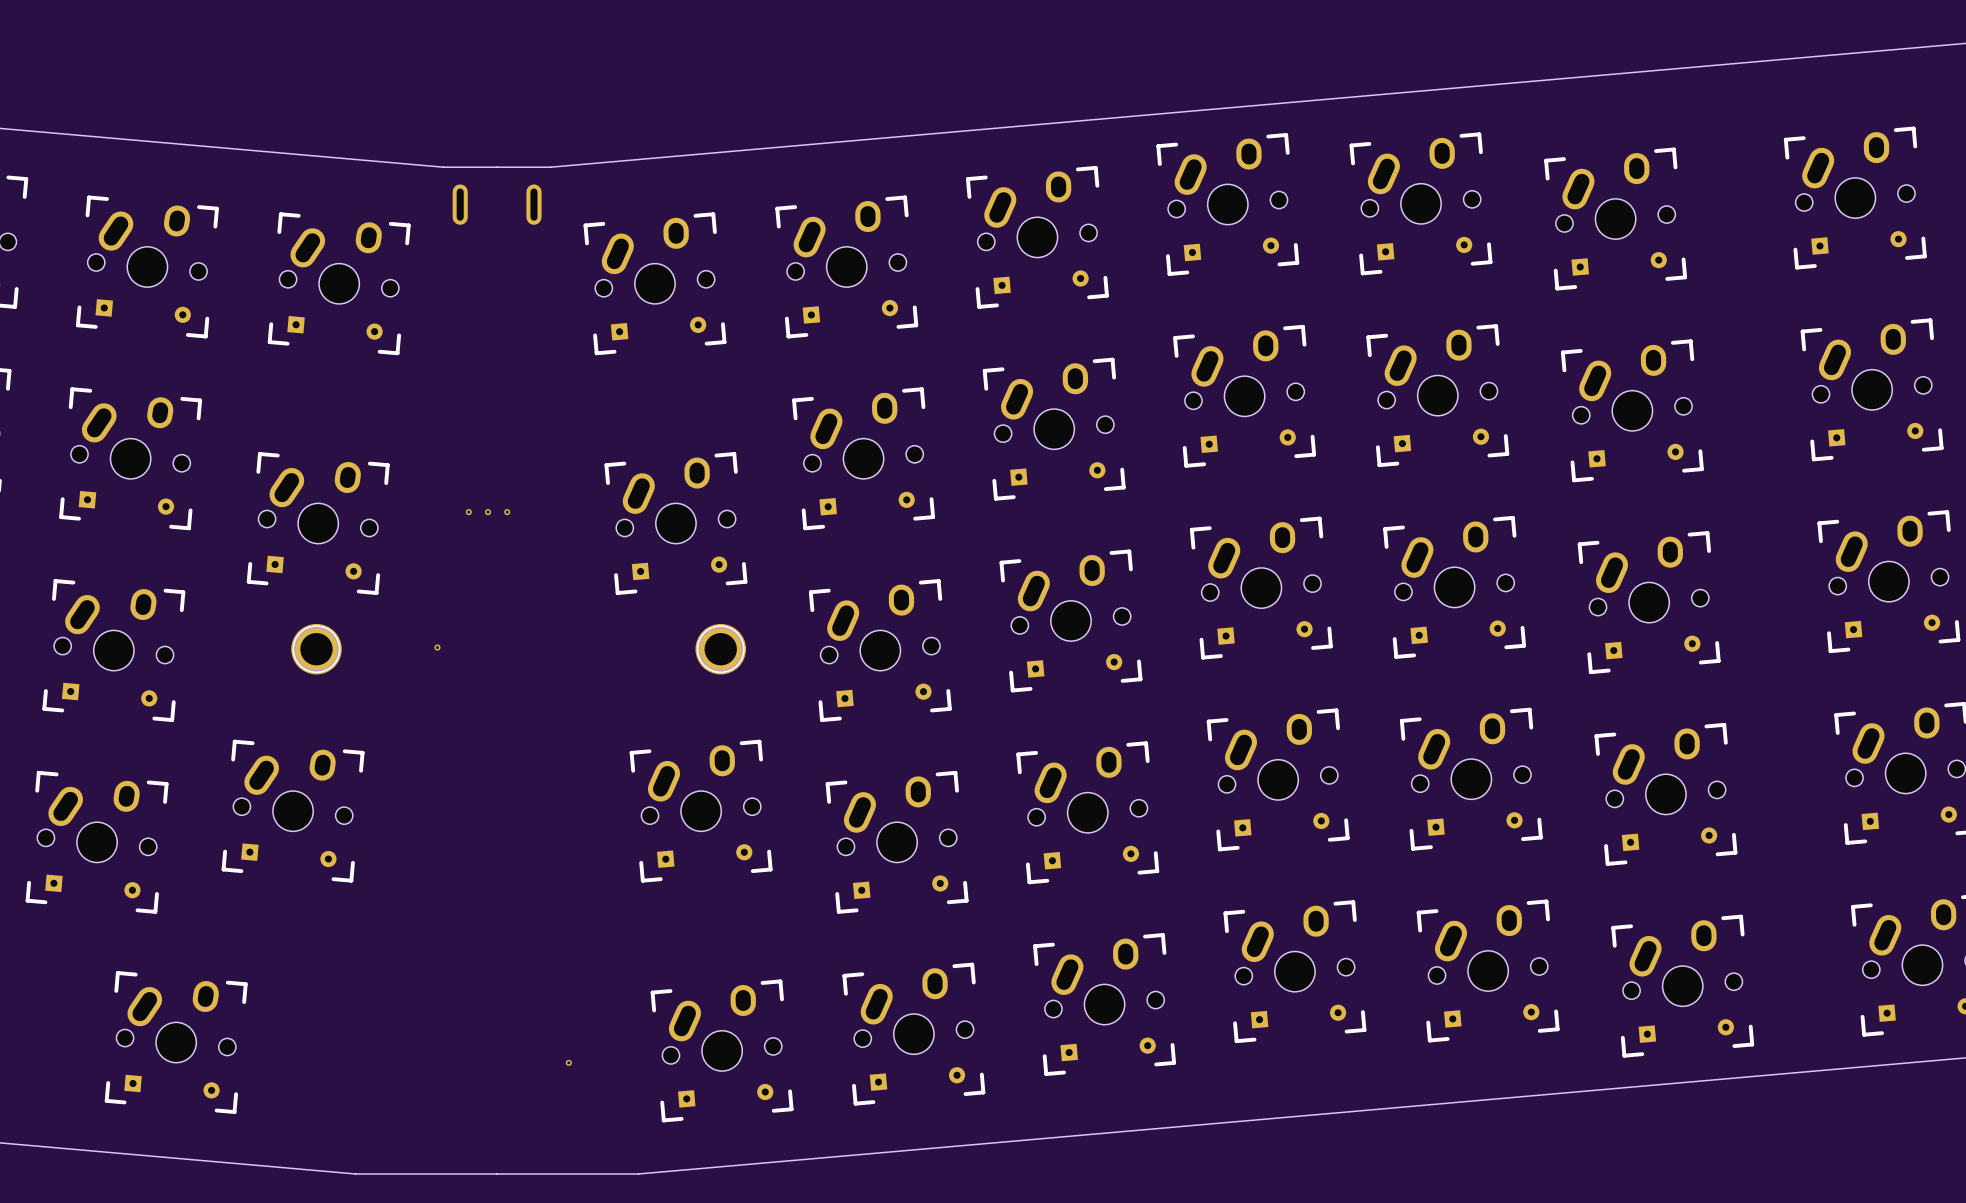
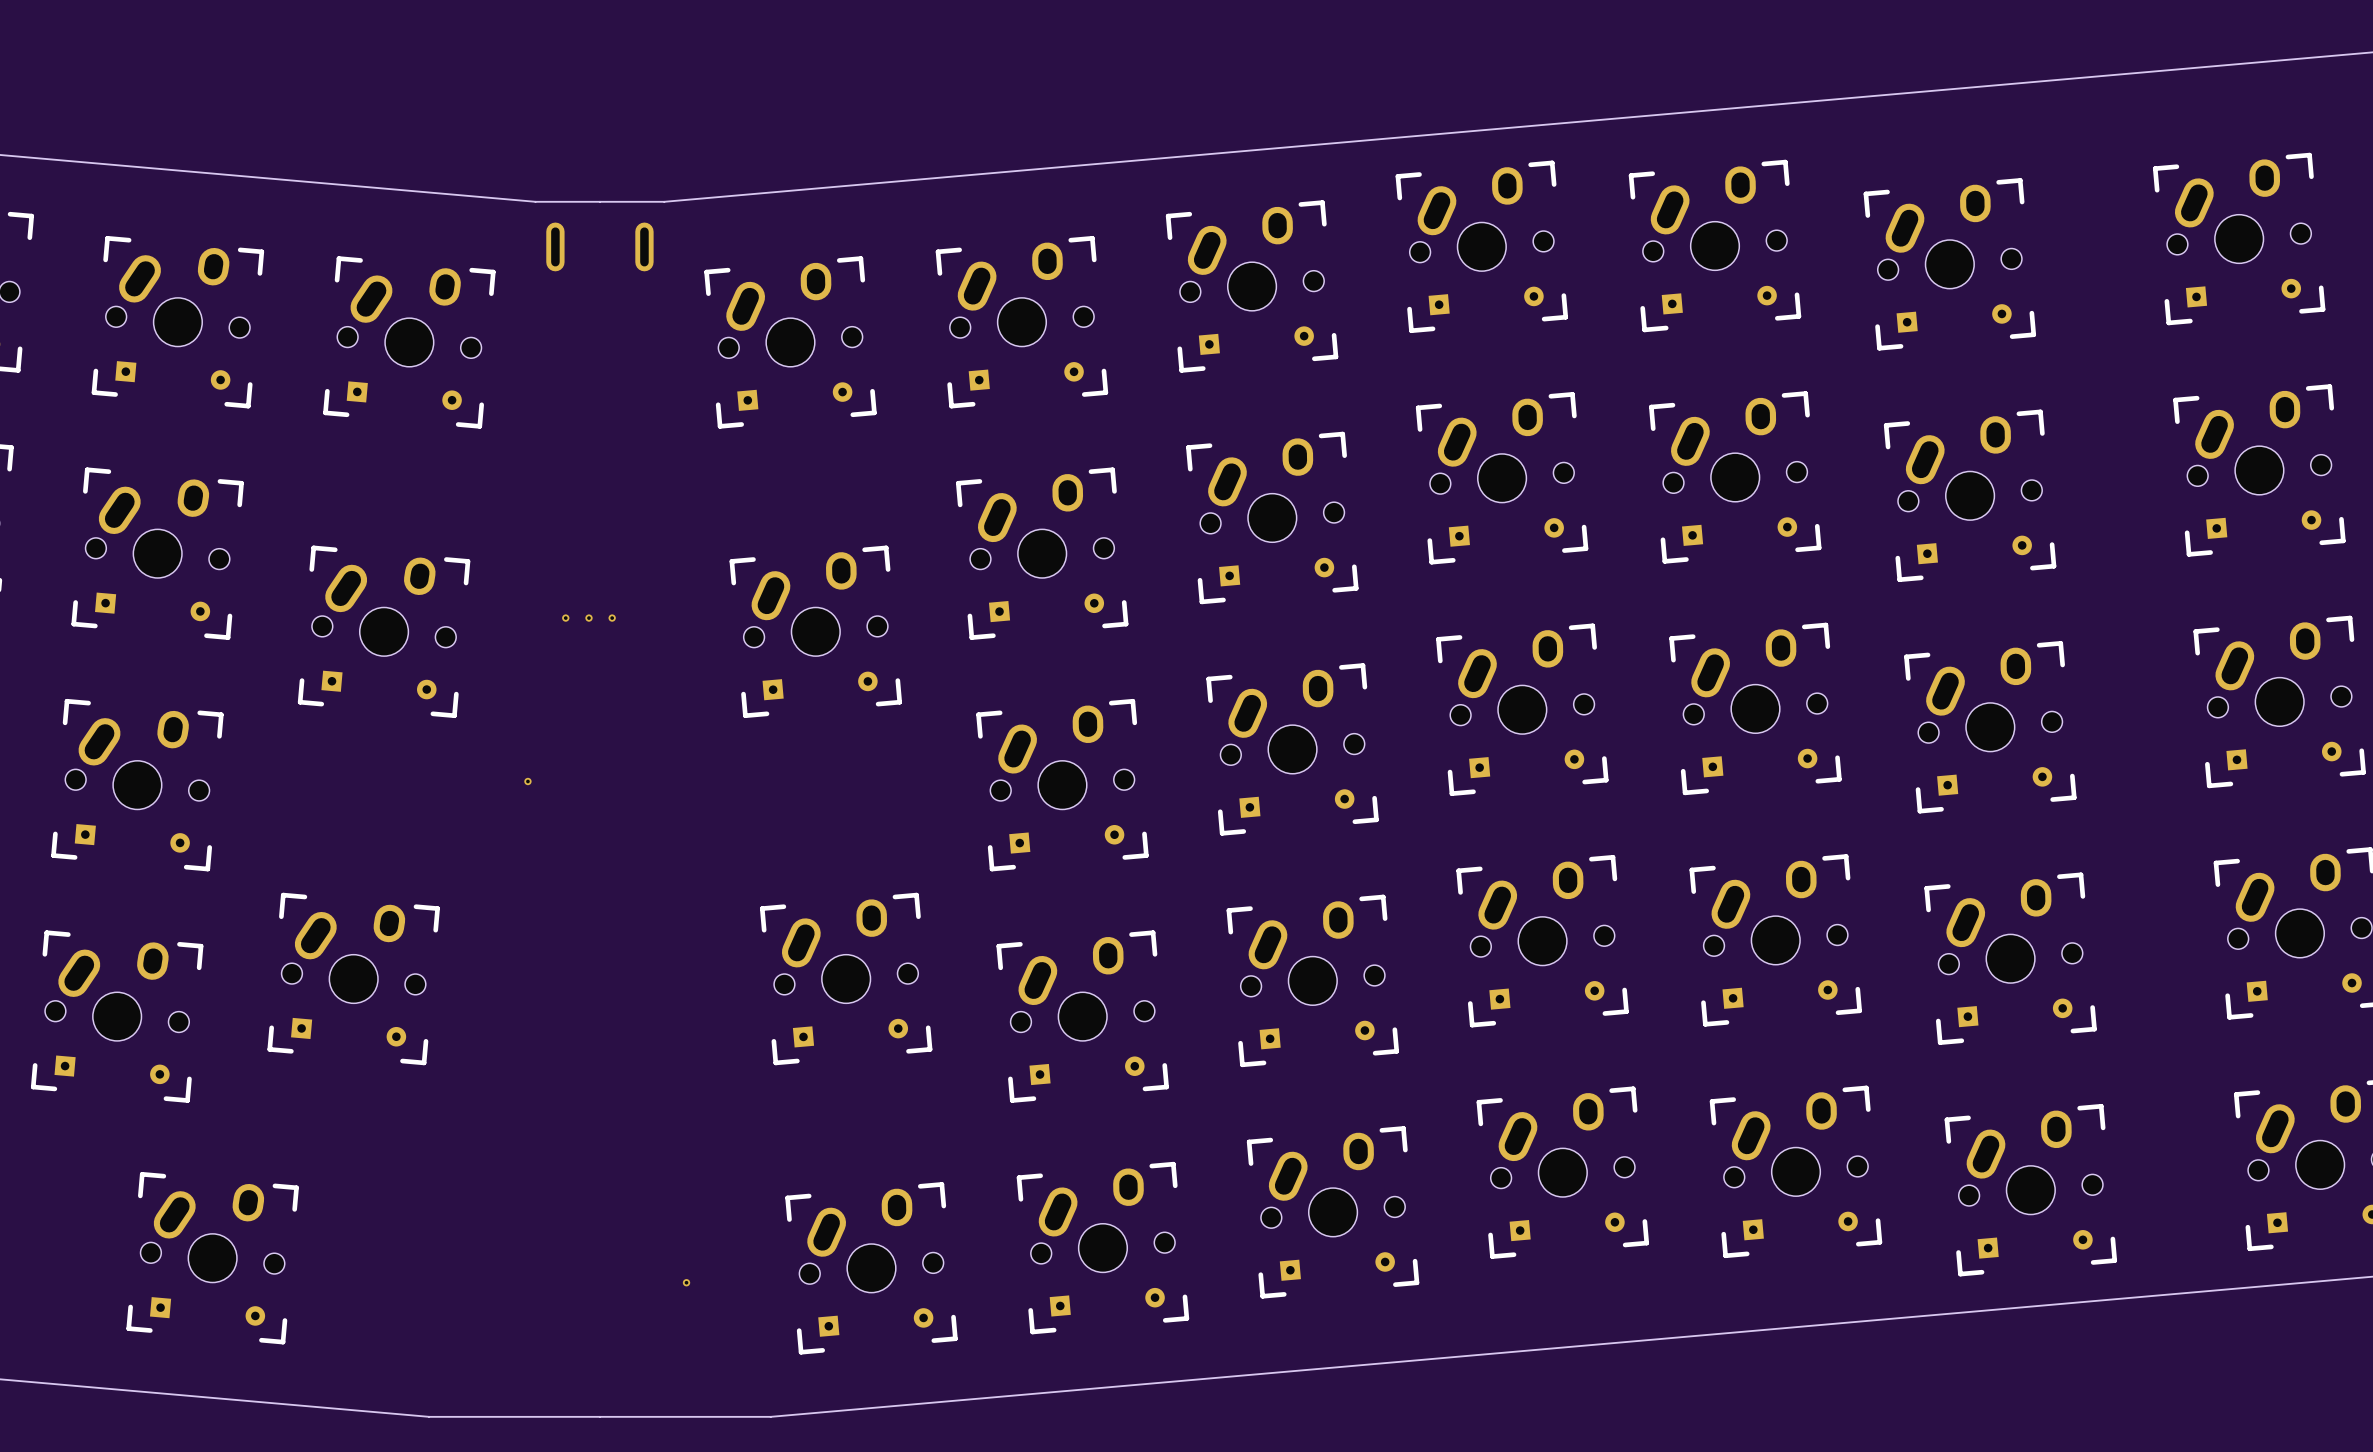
part: (316, 649) -> none
part: (720, 649) -> none

